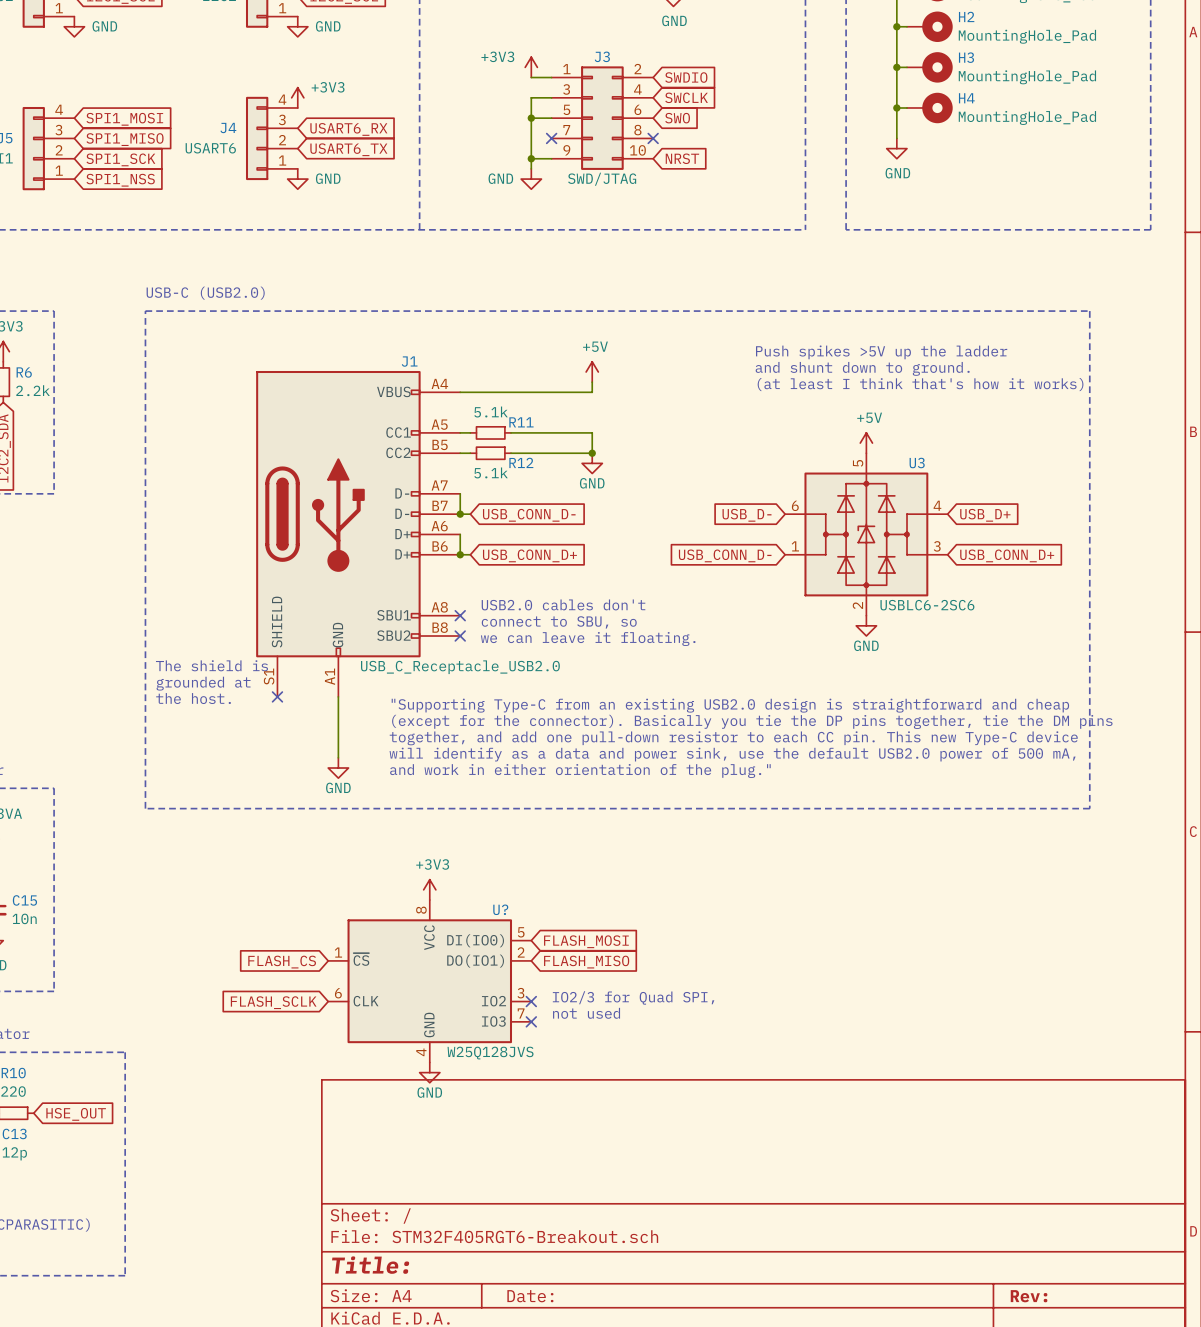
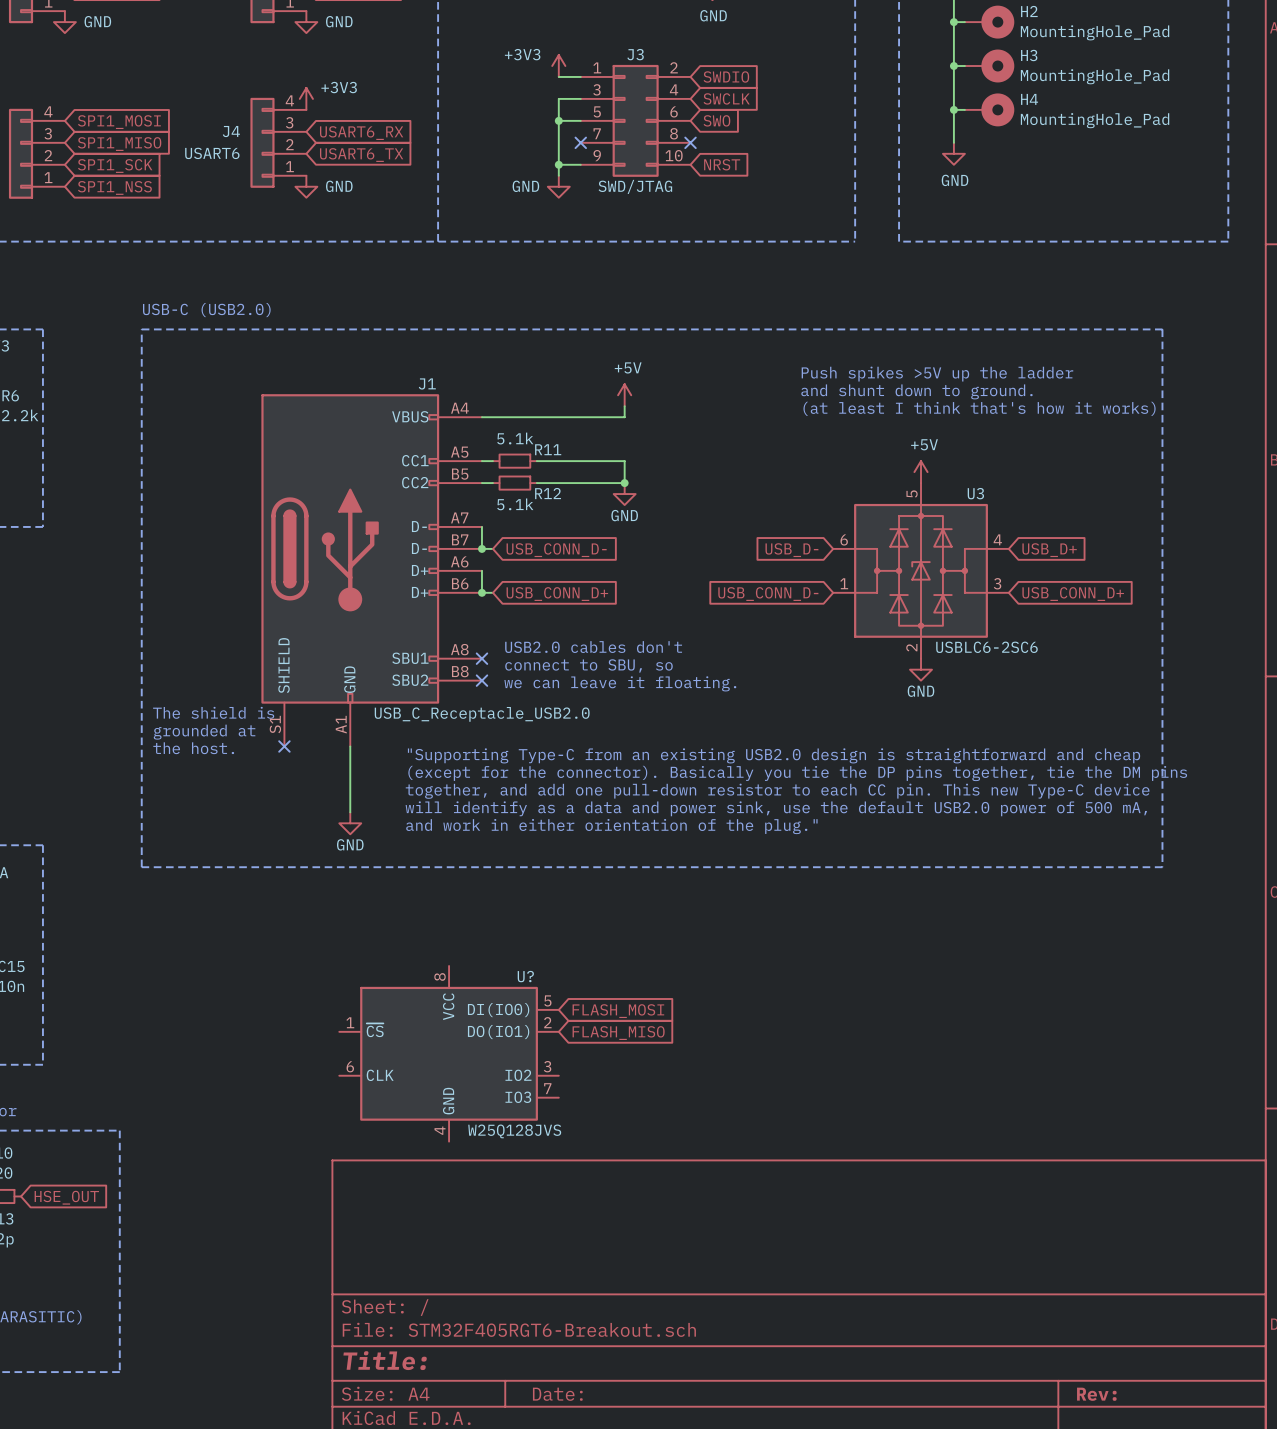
power symbol: +3V3 (429, 889) -> none
global label: FLASH_CS (282, 962) -> none
text: IO2/3 for Quad SPI, (633, 997) -> none
no-connect mark: (531, 1001) -> none
global label: FLASH_SCLK (273, 1002) -> none
text: not used (586, 1013) -> none
no-connect mark: (531, 1021) -> none
power symbol: GND (429, 1072) -> none

